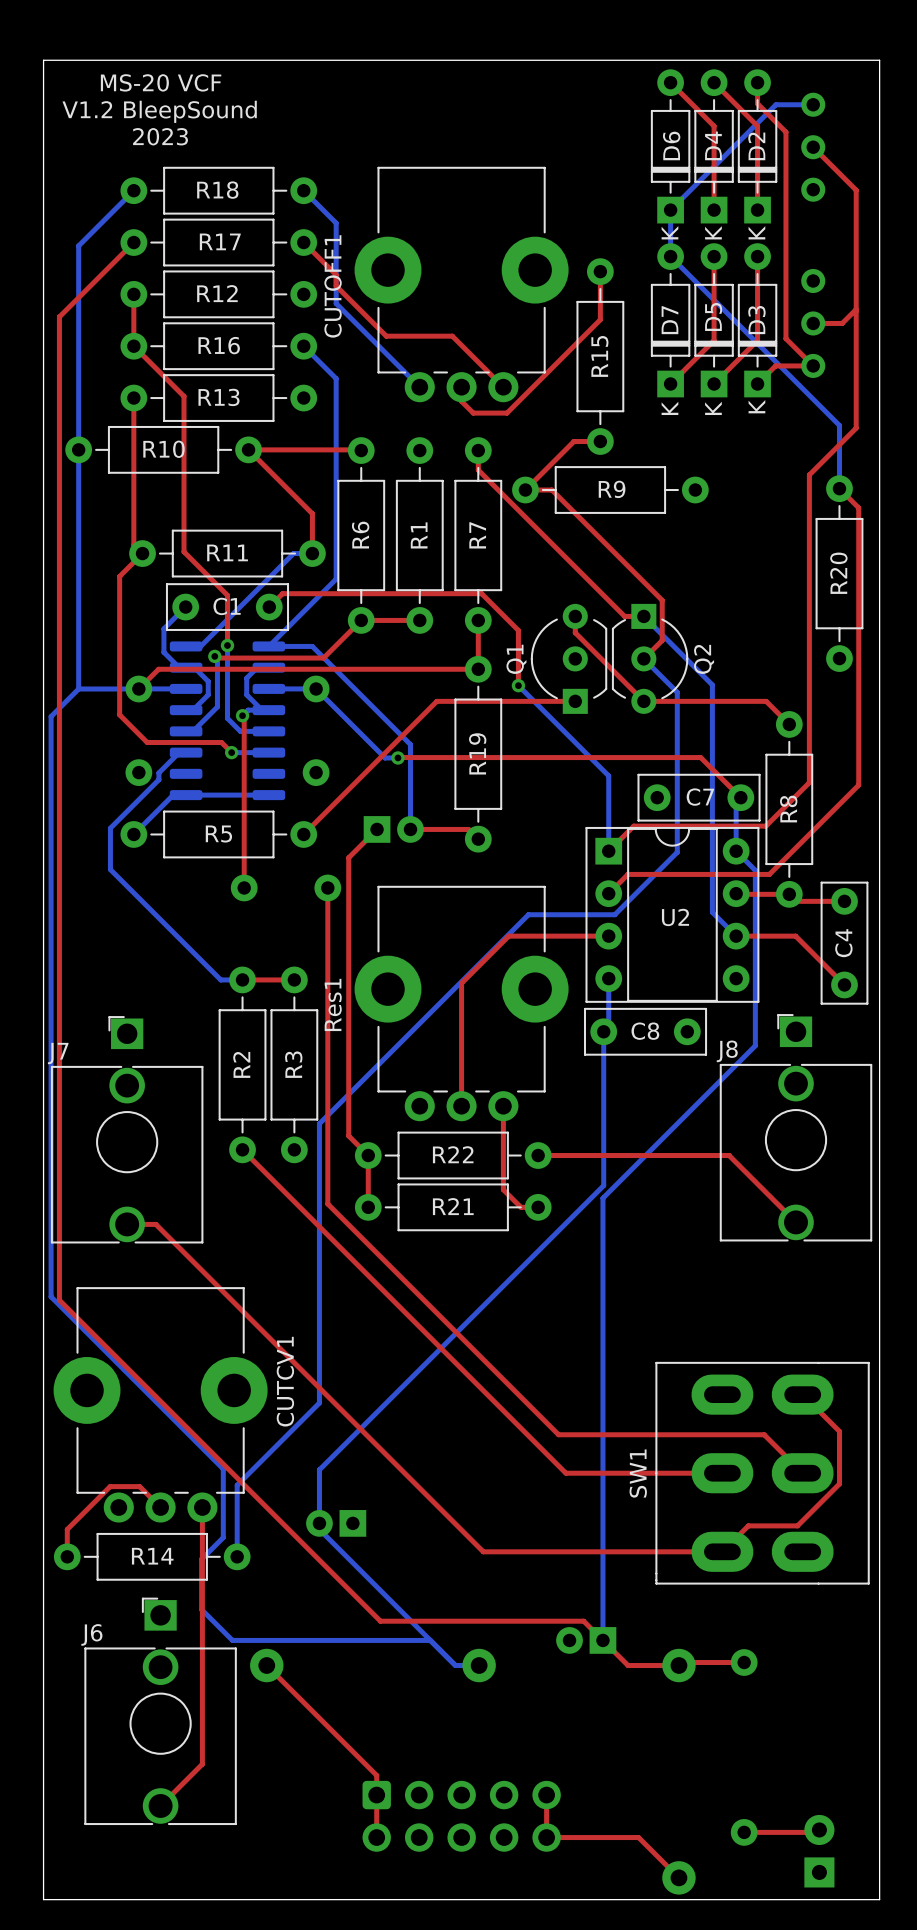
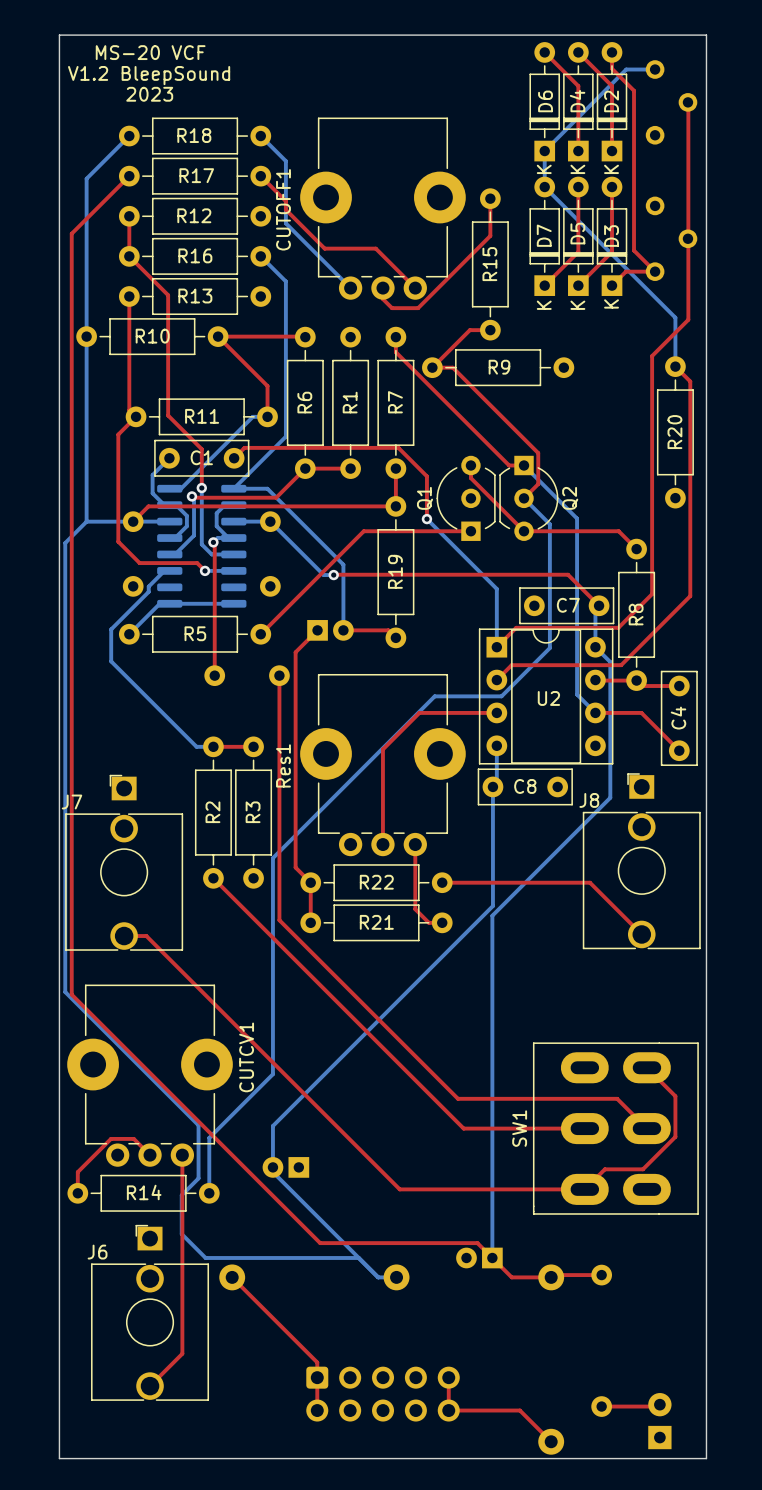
top track: (813, 147) (856, 190) -> (687, 102) (688, 135)
part: (813, 147) -> none
part: none -> (671, 102)
top track: (856, 309) (842, 323) (813, 323) -> none
part: (813, 323) -> none
part: none -> (671, 238)

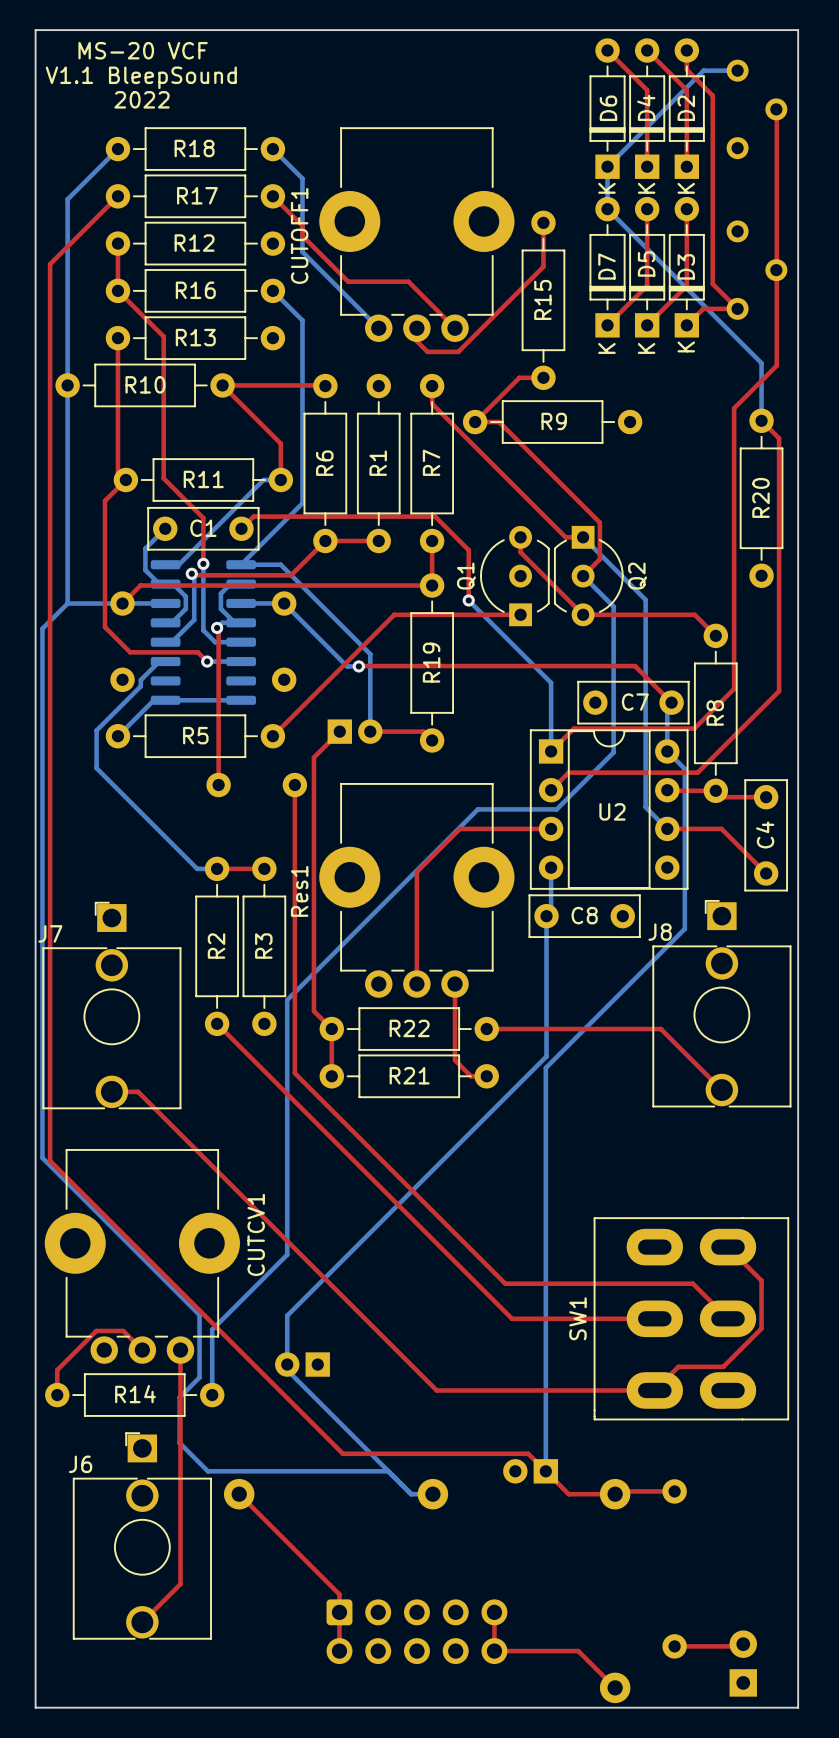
text: V1.2 BleepSound (149, 75) -> V1.1 BleepSound (141, 77)
text: 2023 (149, 94) -> 2022 (142, 99)

